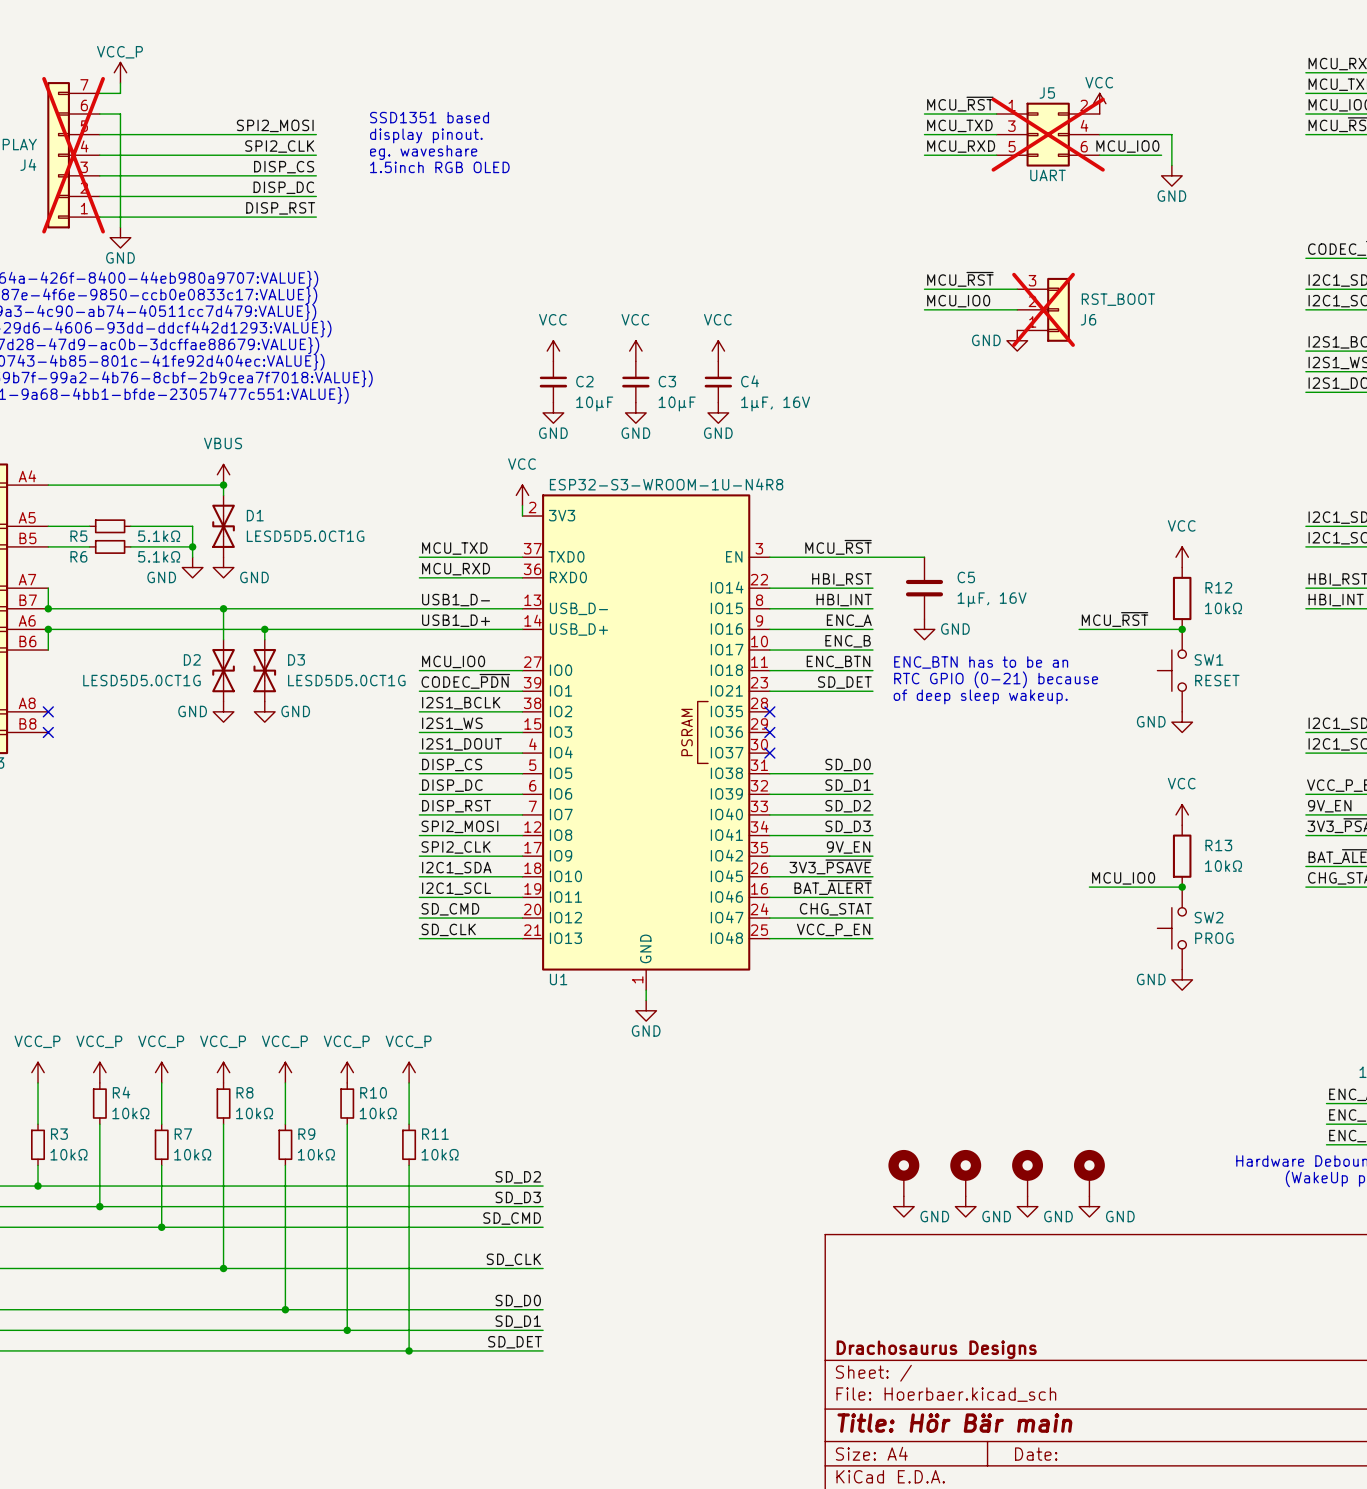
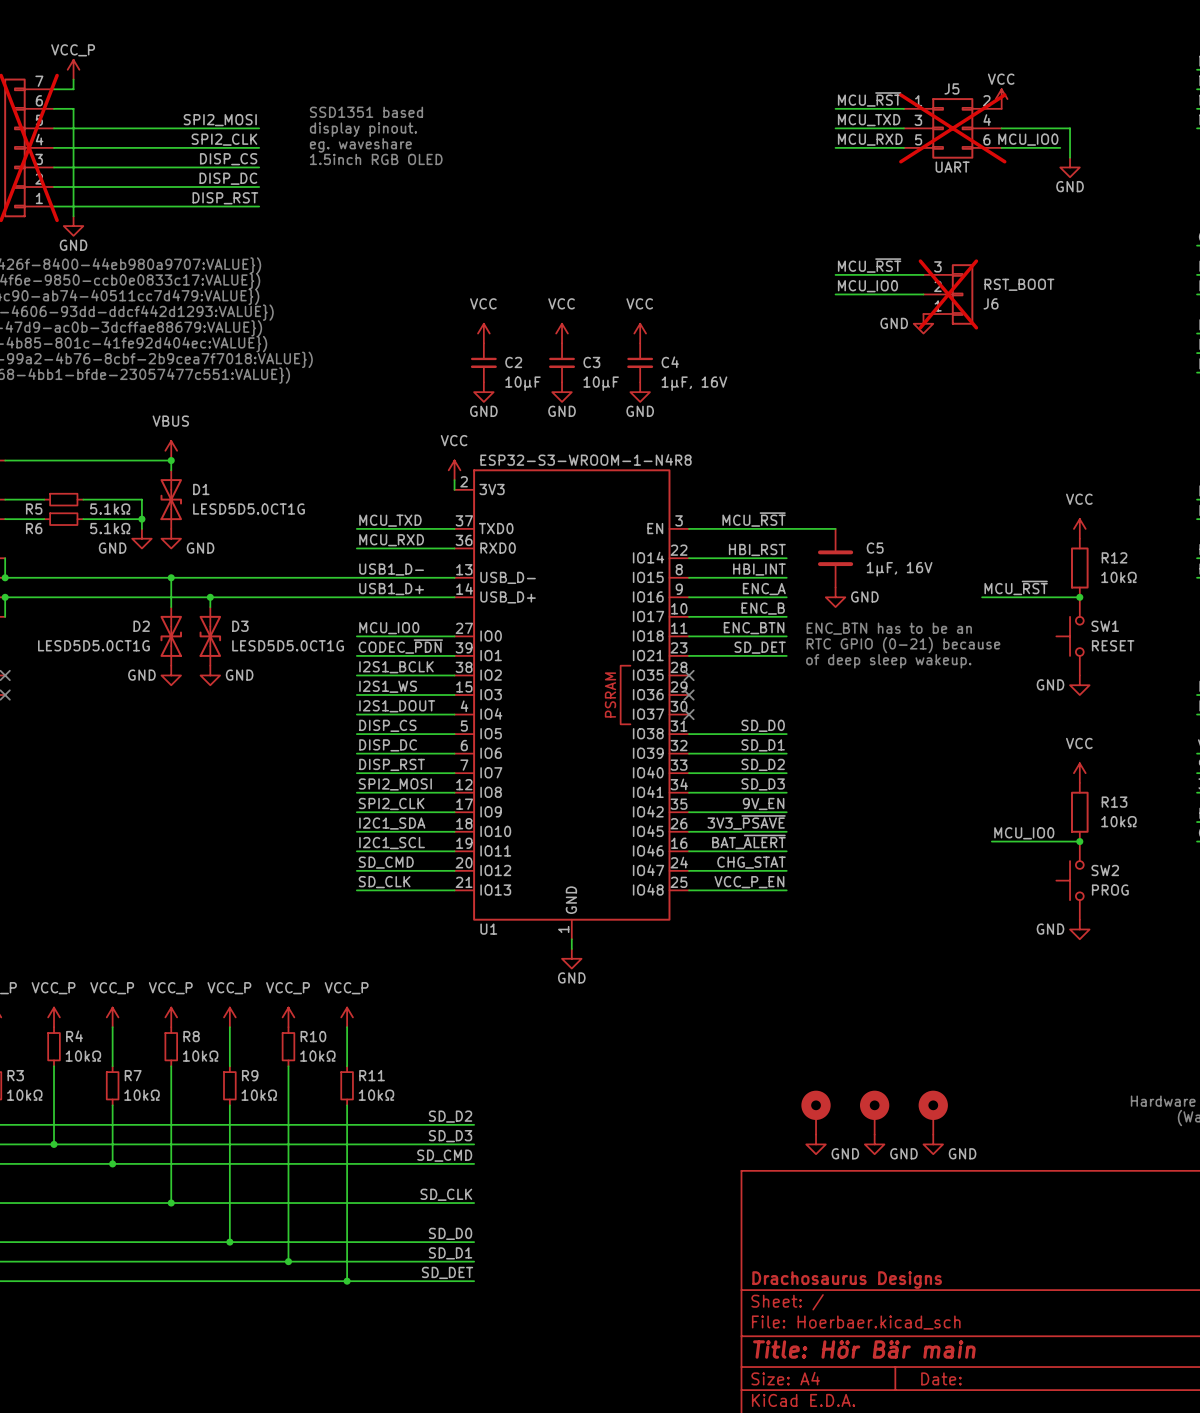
U1 value: ESP32-S3-WROOM-1U-N4R8 (666, 484) -> ESP32-S3-WROOM-1-N4R8 (586, 459)
part: (1089, 1173) -> none
power symbol: GND (1089, 1206) -> none

